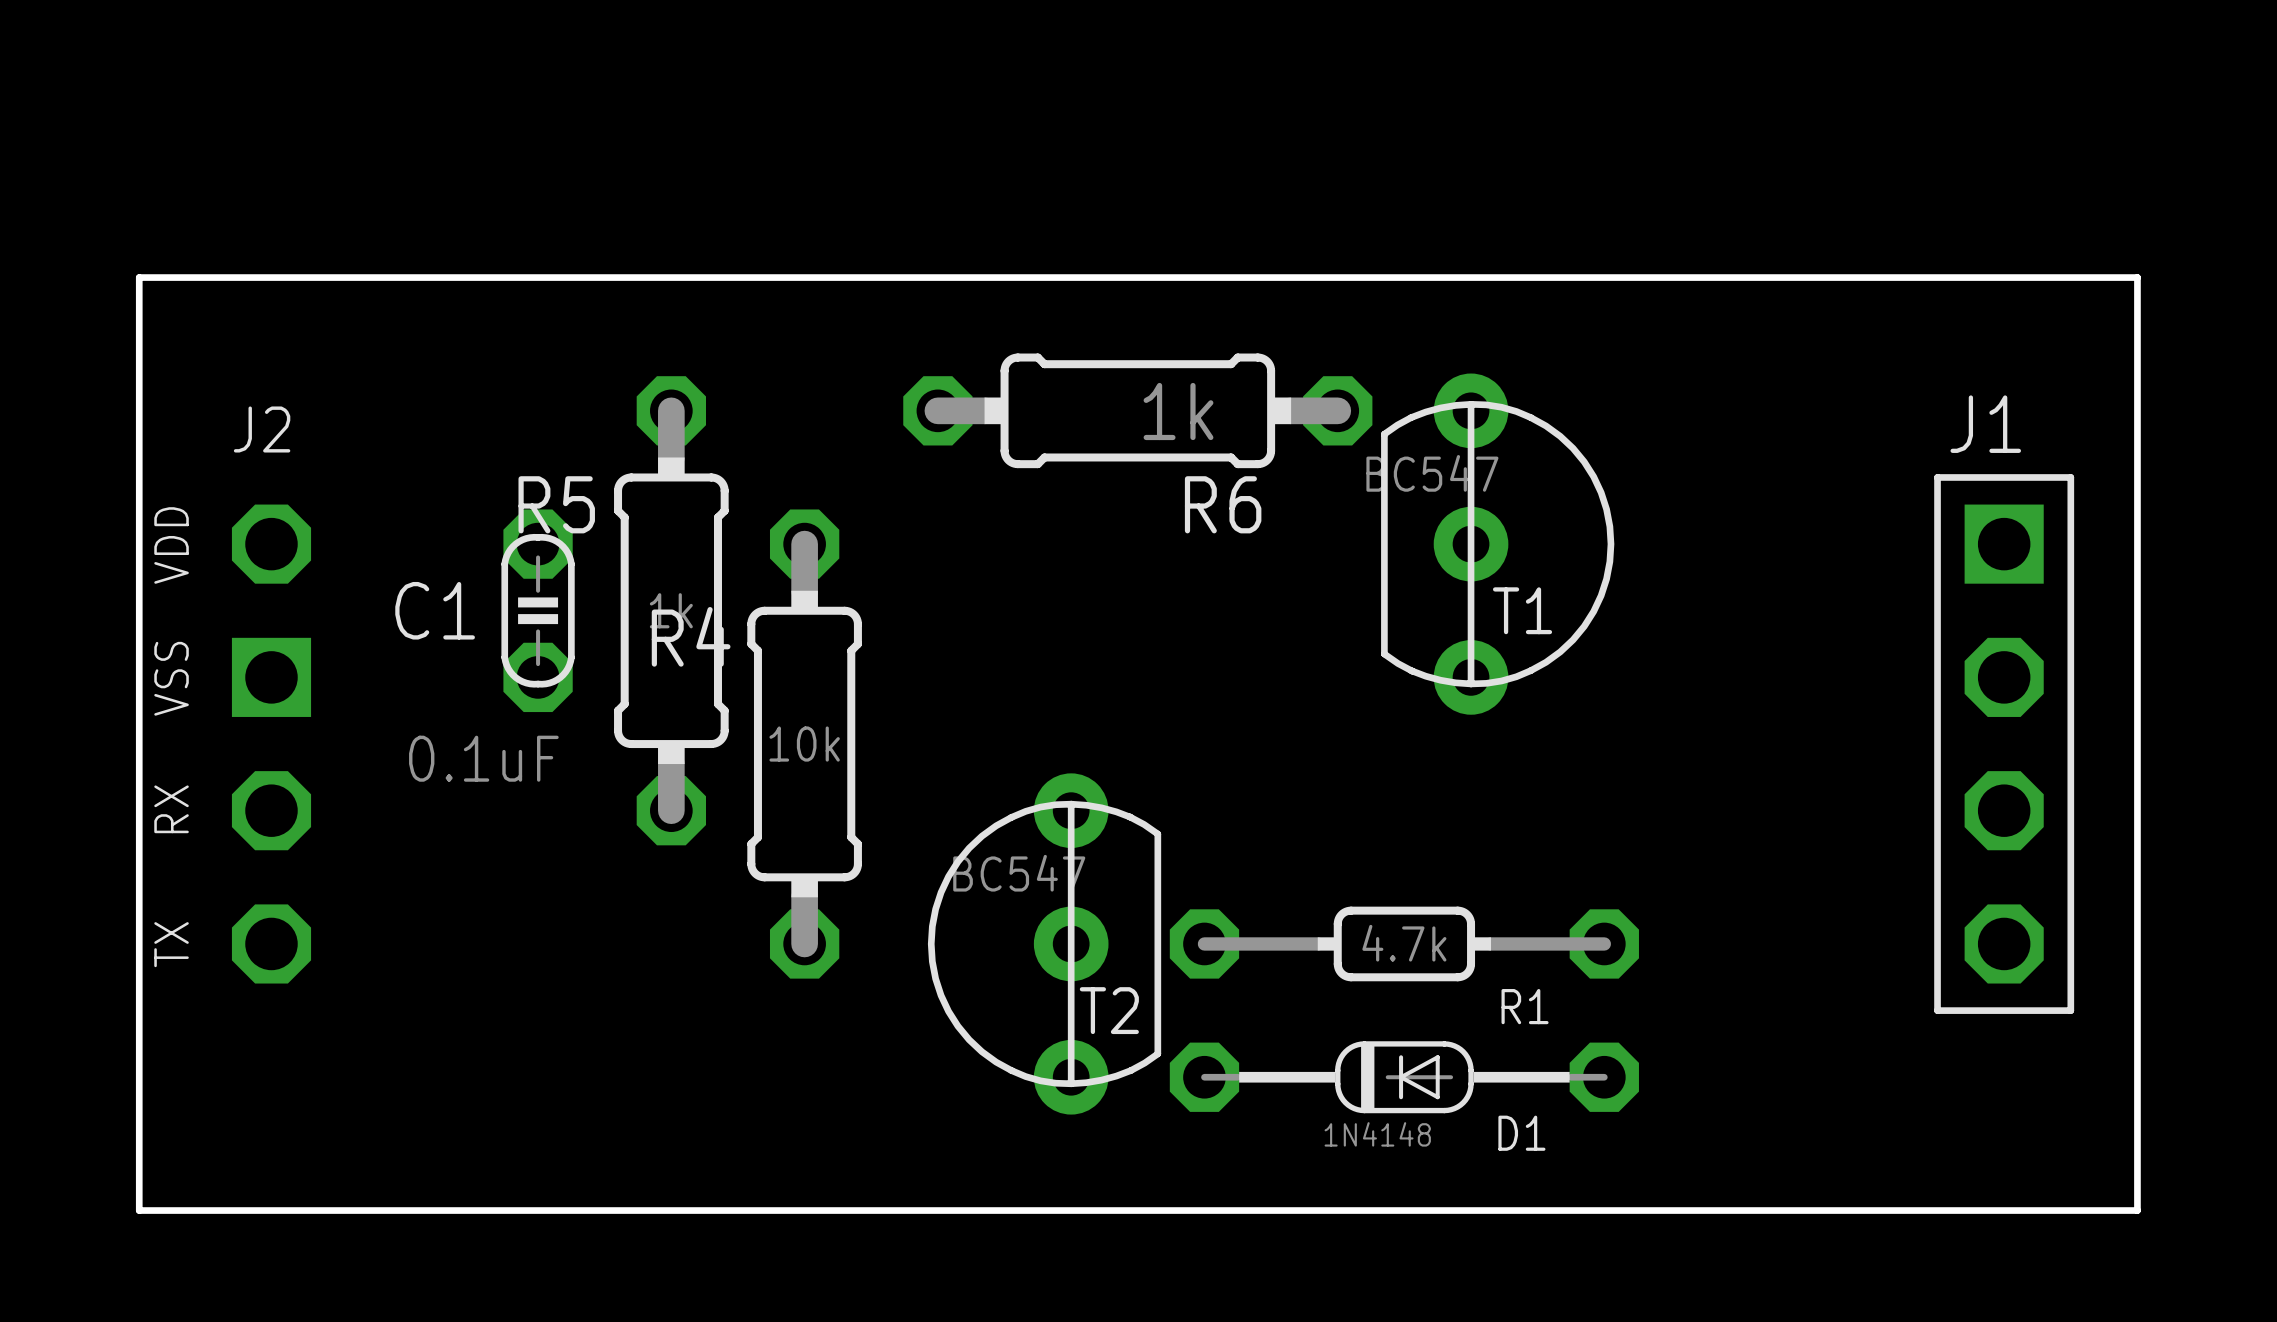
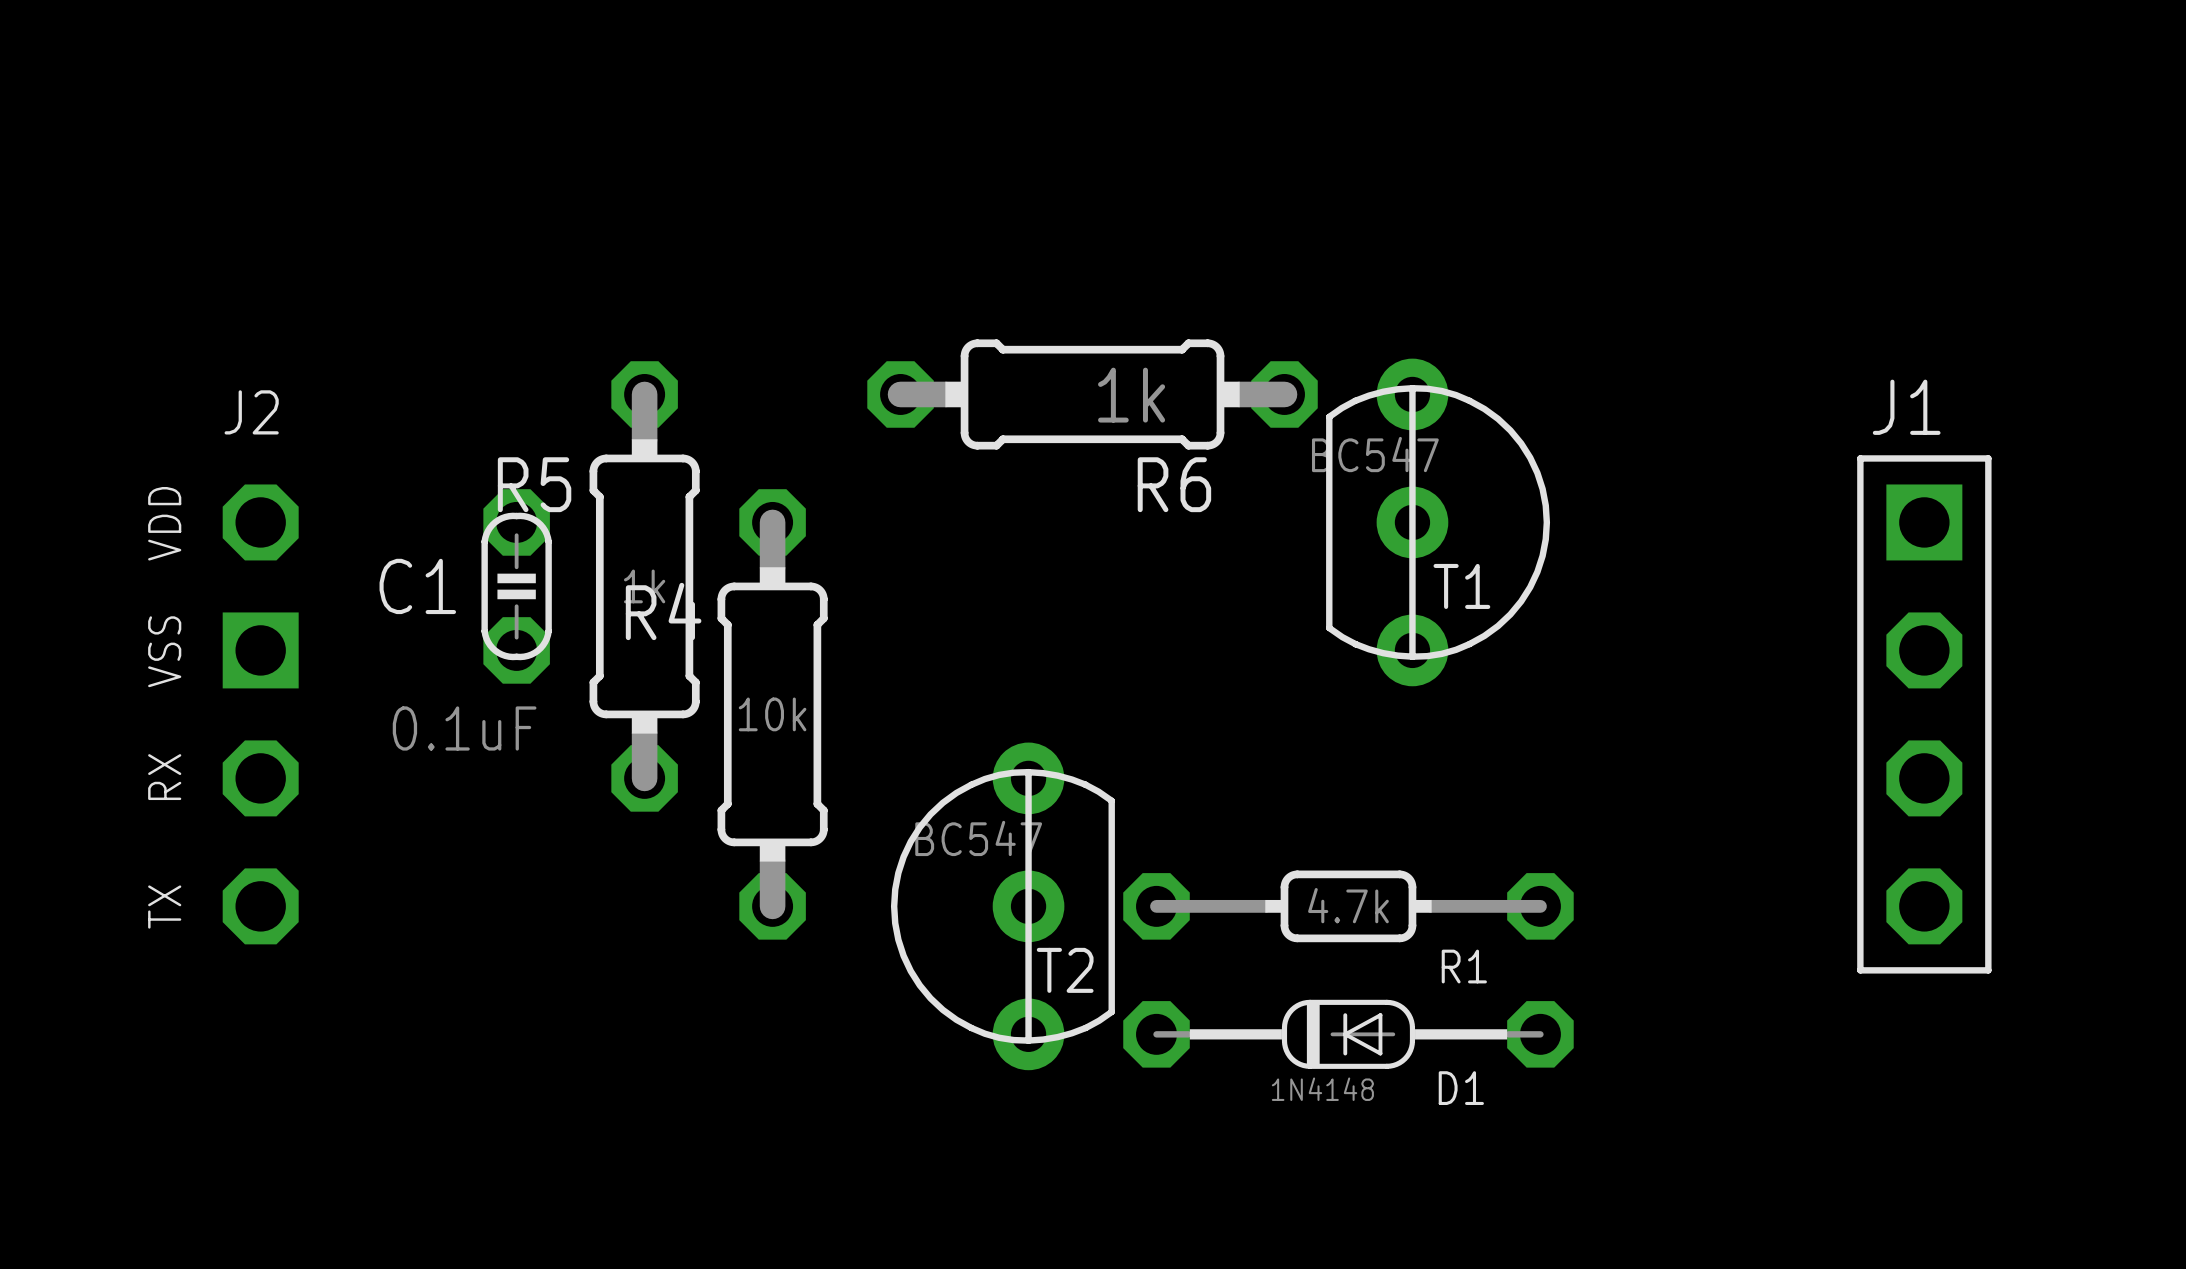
board edge: (139, 277) (2137, 277) (2137, 1210) (139, 1210) (139, 277) -> none

